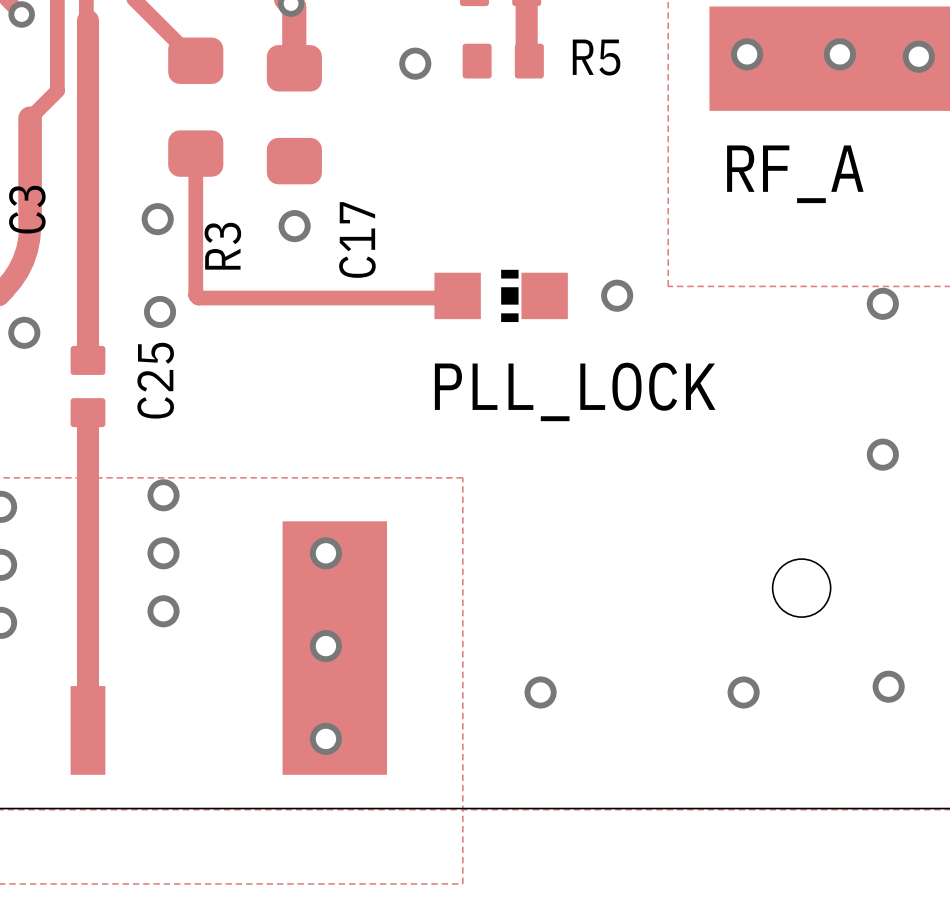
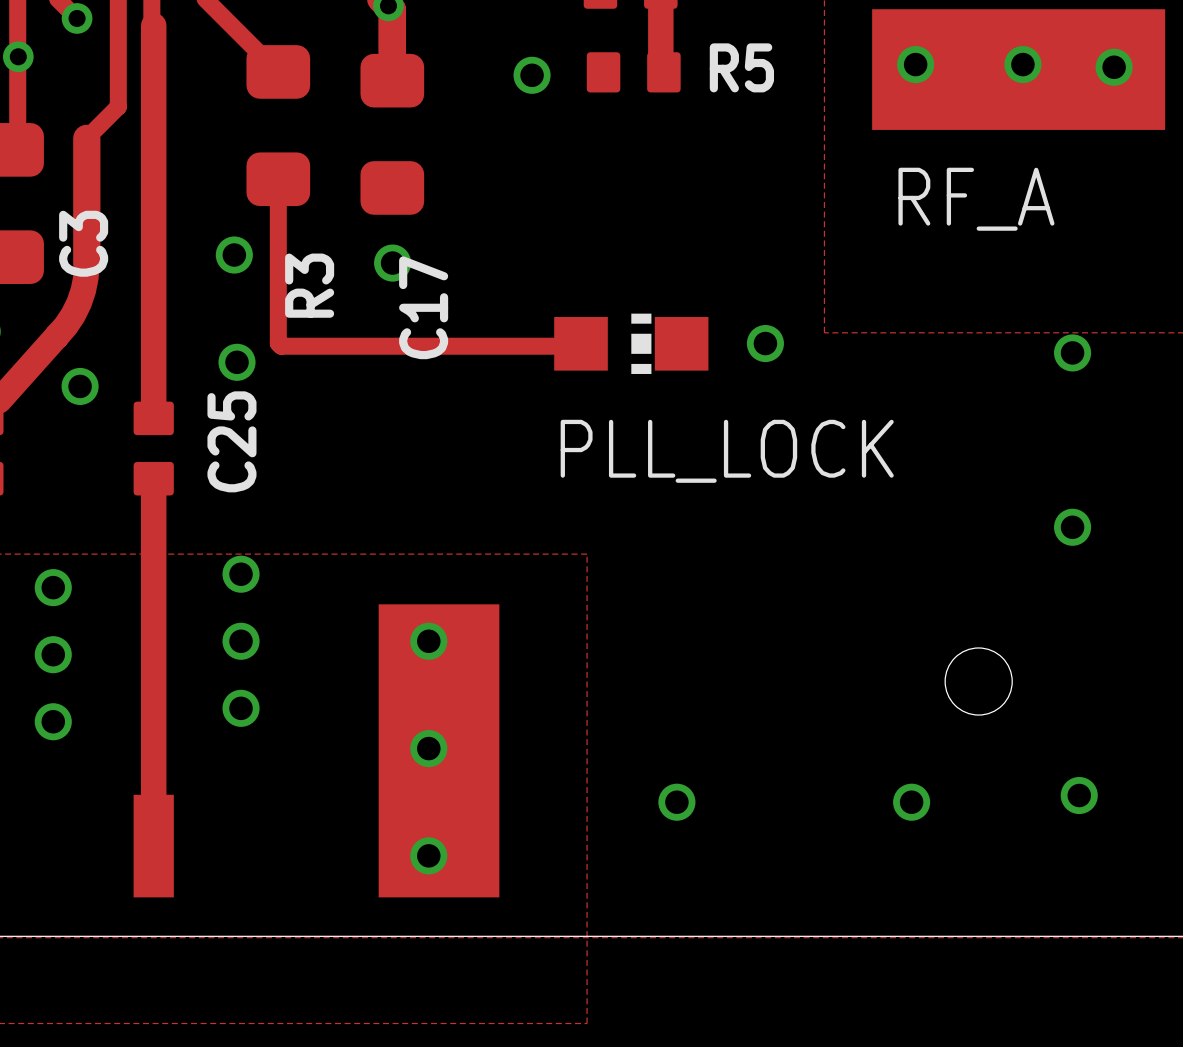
C17 name position: C17 (357, 239) -> C17 (423, 307)

